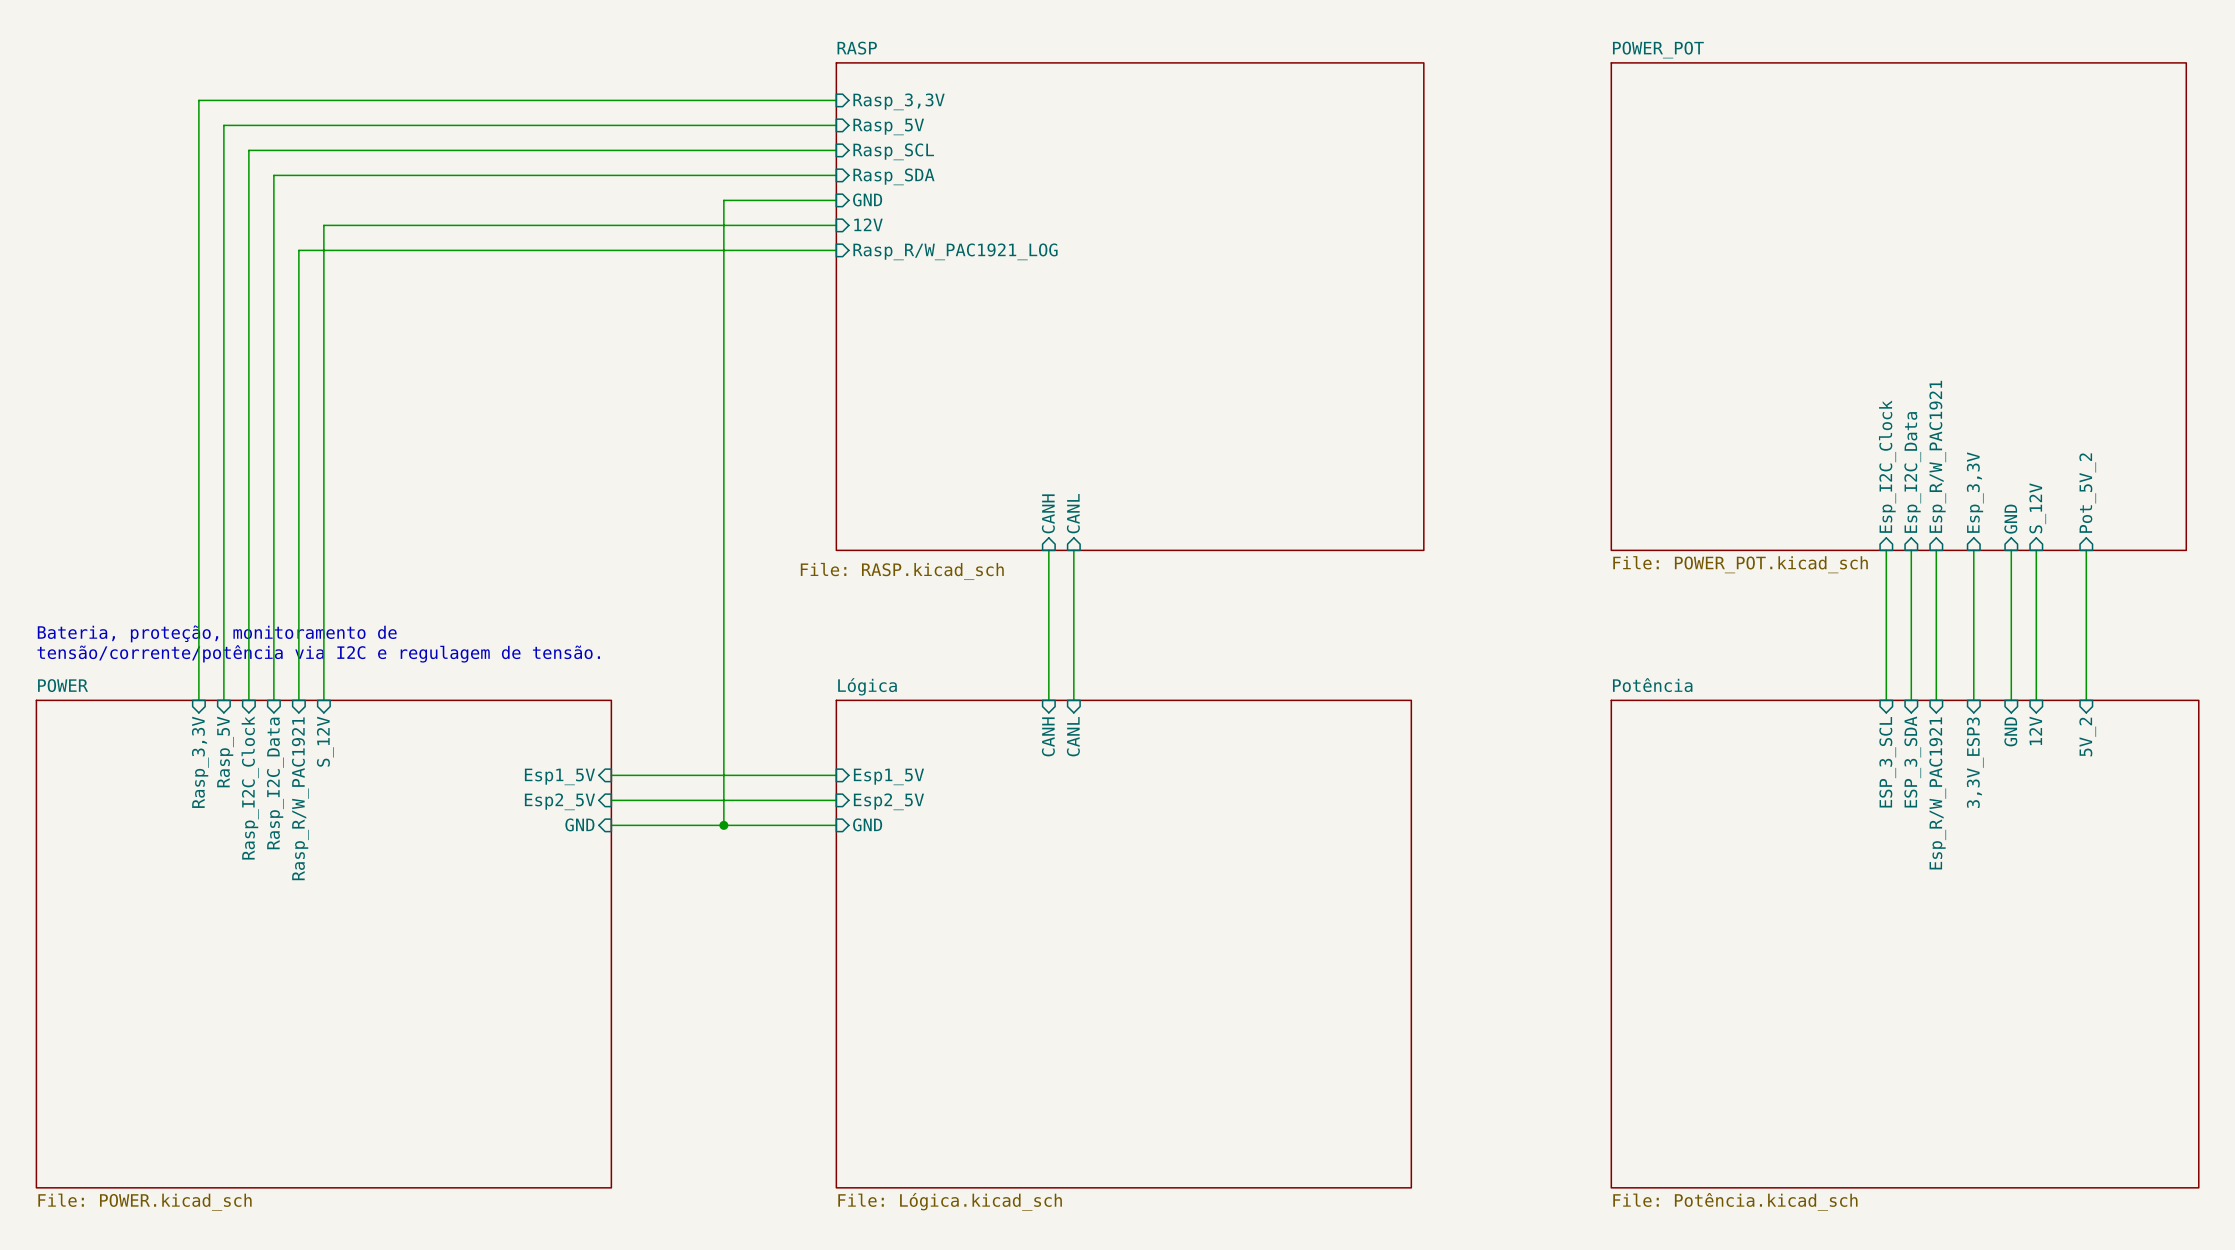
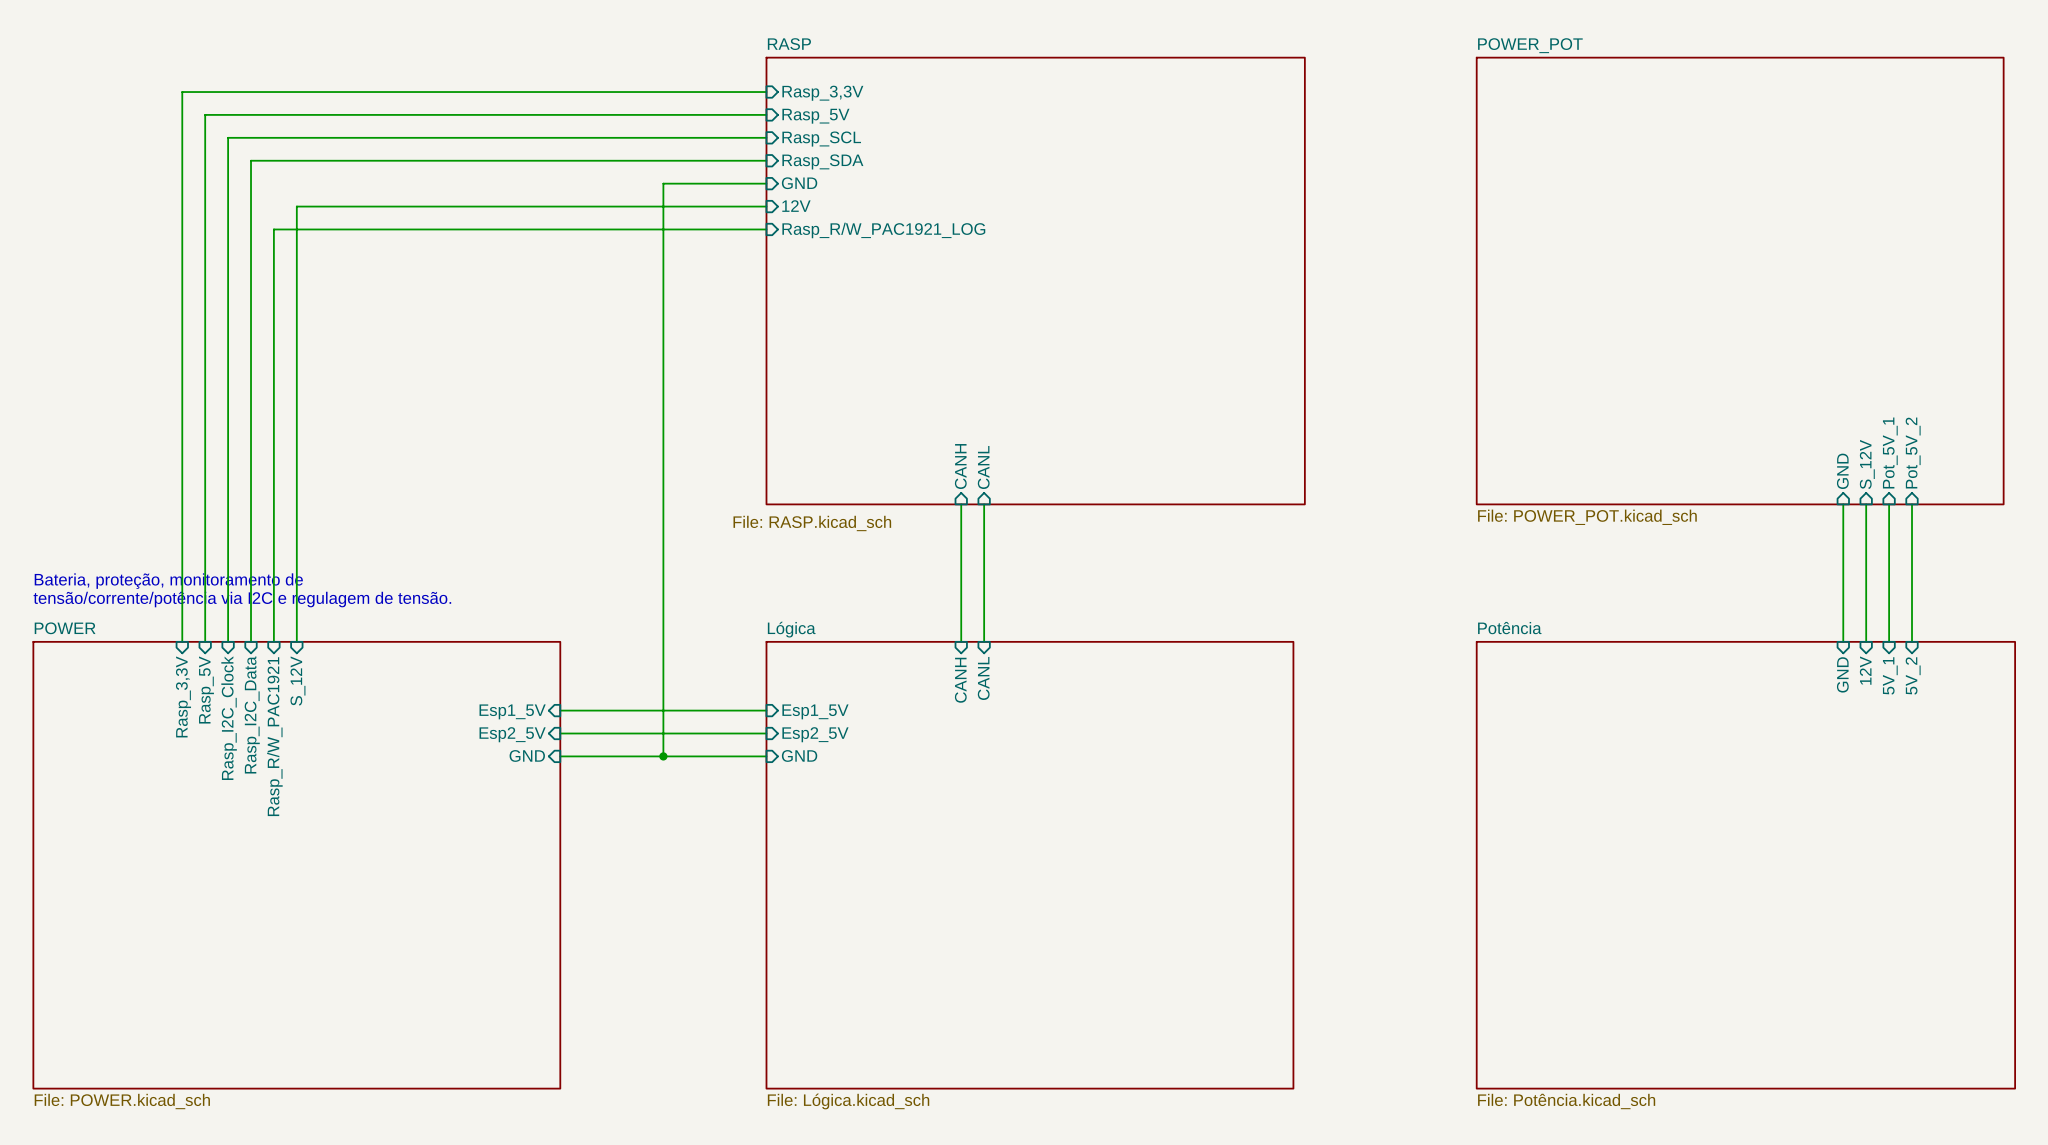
sheet pin: Esp_R/W_PAC1921 (1937, 456) -> none
sheet pin: Esp_I2C_Clock (1887, 466) -> none
sheet pin: Esp_I2C_Data (1912, 472) -> none
sheet pin: Esp_3,3V (1975, 492) -> none
sheet pin: none -> Pot_5V_1 (1890, 453)
wire: (1886, 550) (1886, 700) -> none
wire: (1911, 550) (1911, 700) -> none
wire: (1936, 550) (1936, 700) -> none
wire: (1973, 550) (1973, 700) -> (1889, 504) (1889, 641)
sheet pin: none -> 5V_1 (1890, 675)
sheet pin: ESP_3_SCL (1887, 762) -> none
sheet pin: ESP_3_SDA (1912, 762) -> none
sheet pin: 3,3V_ESP3 (1975, 762) -> none
sheet pin: Esp_R/W_PAC1921 (1937, 793) -> none

